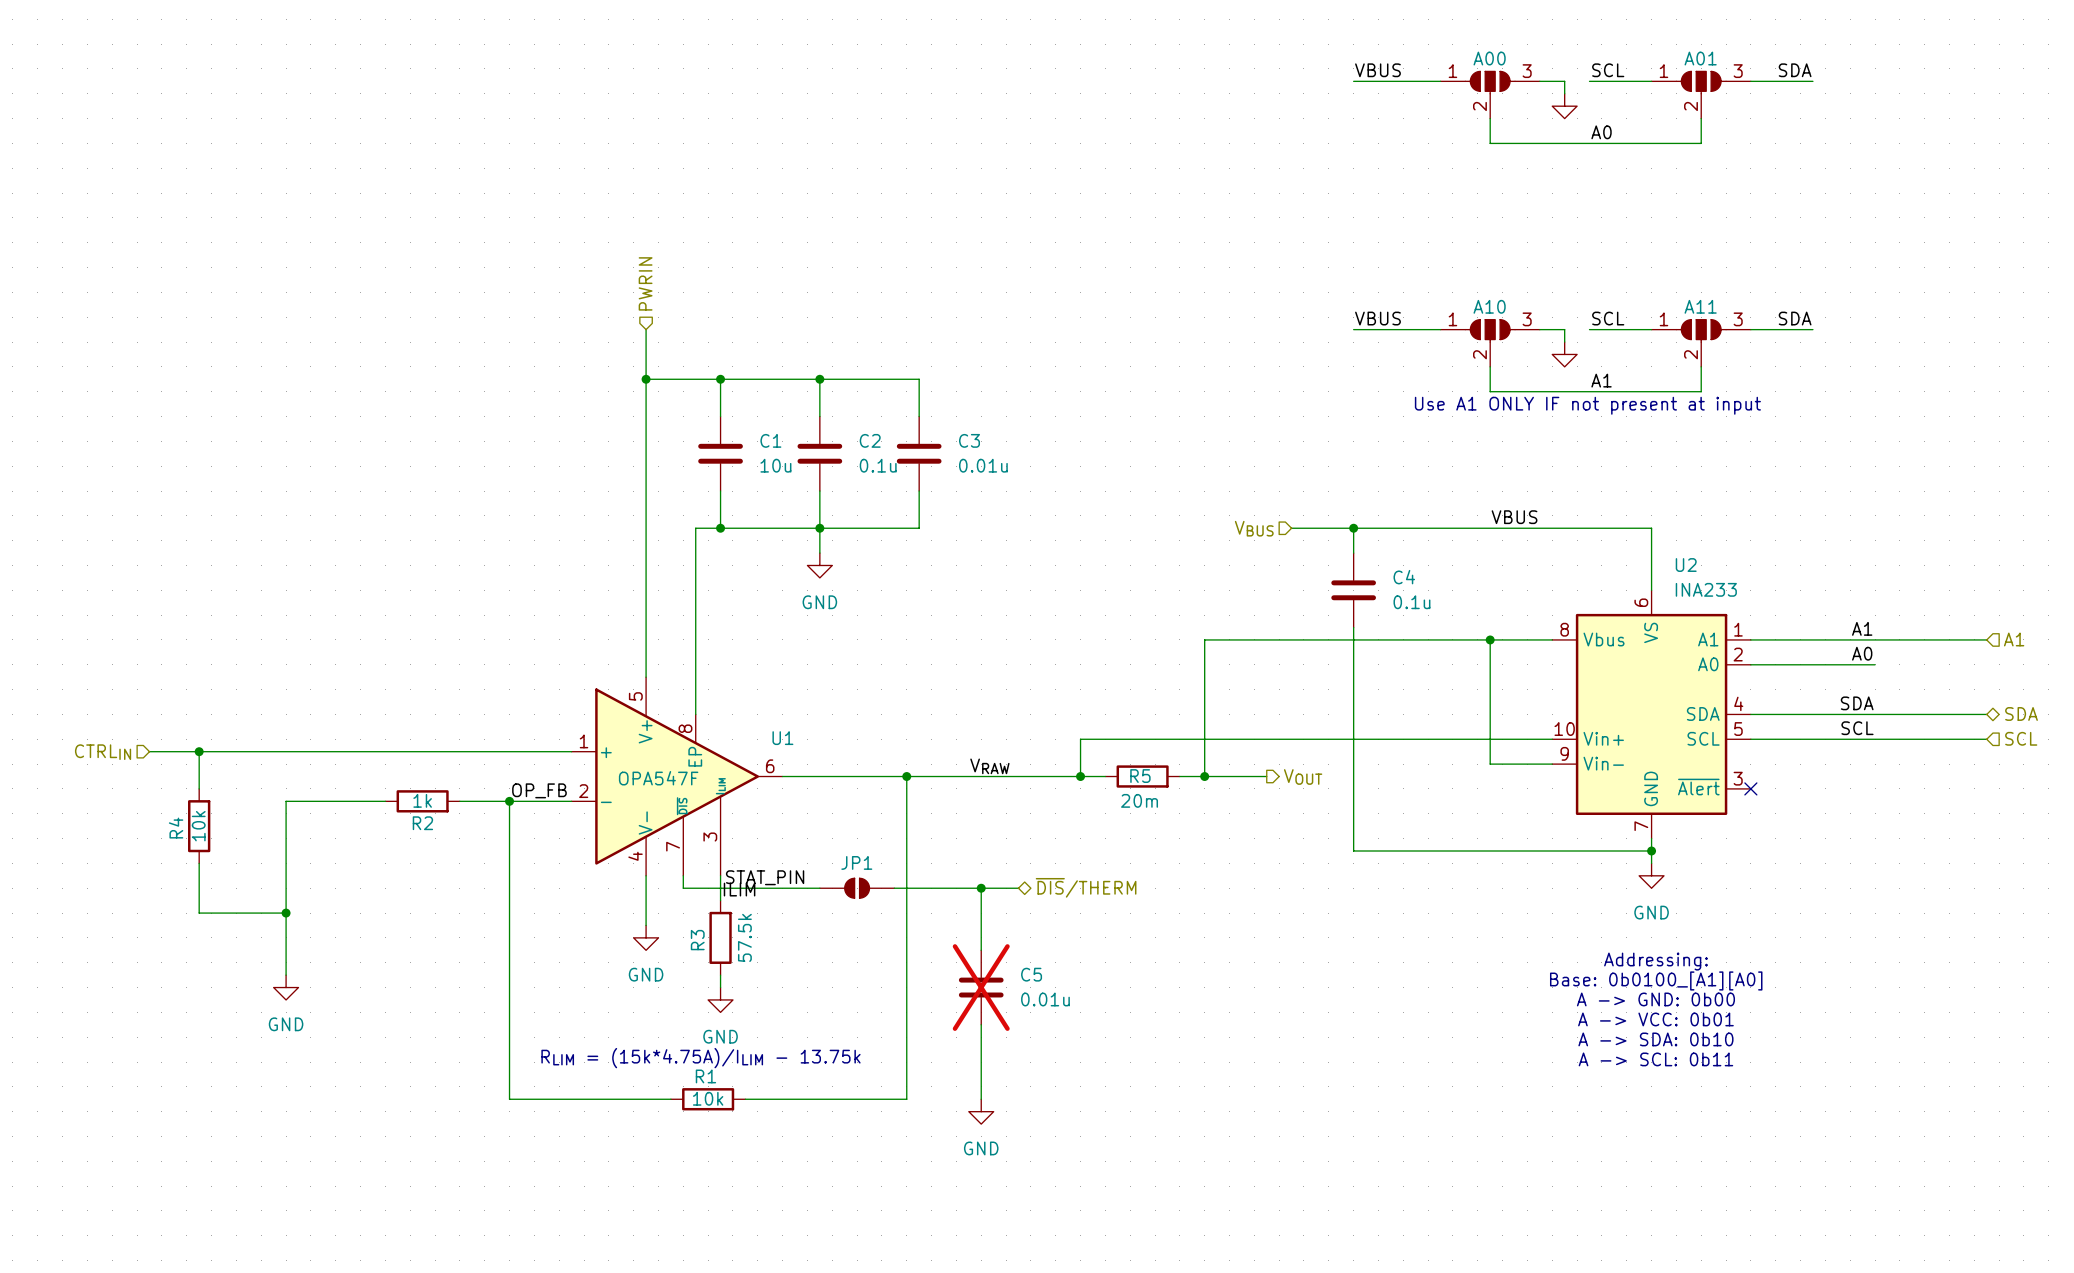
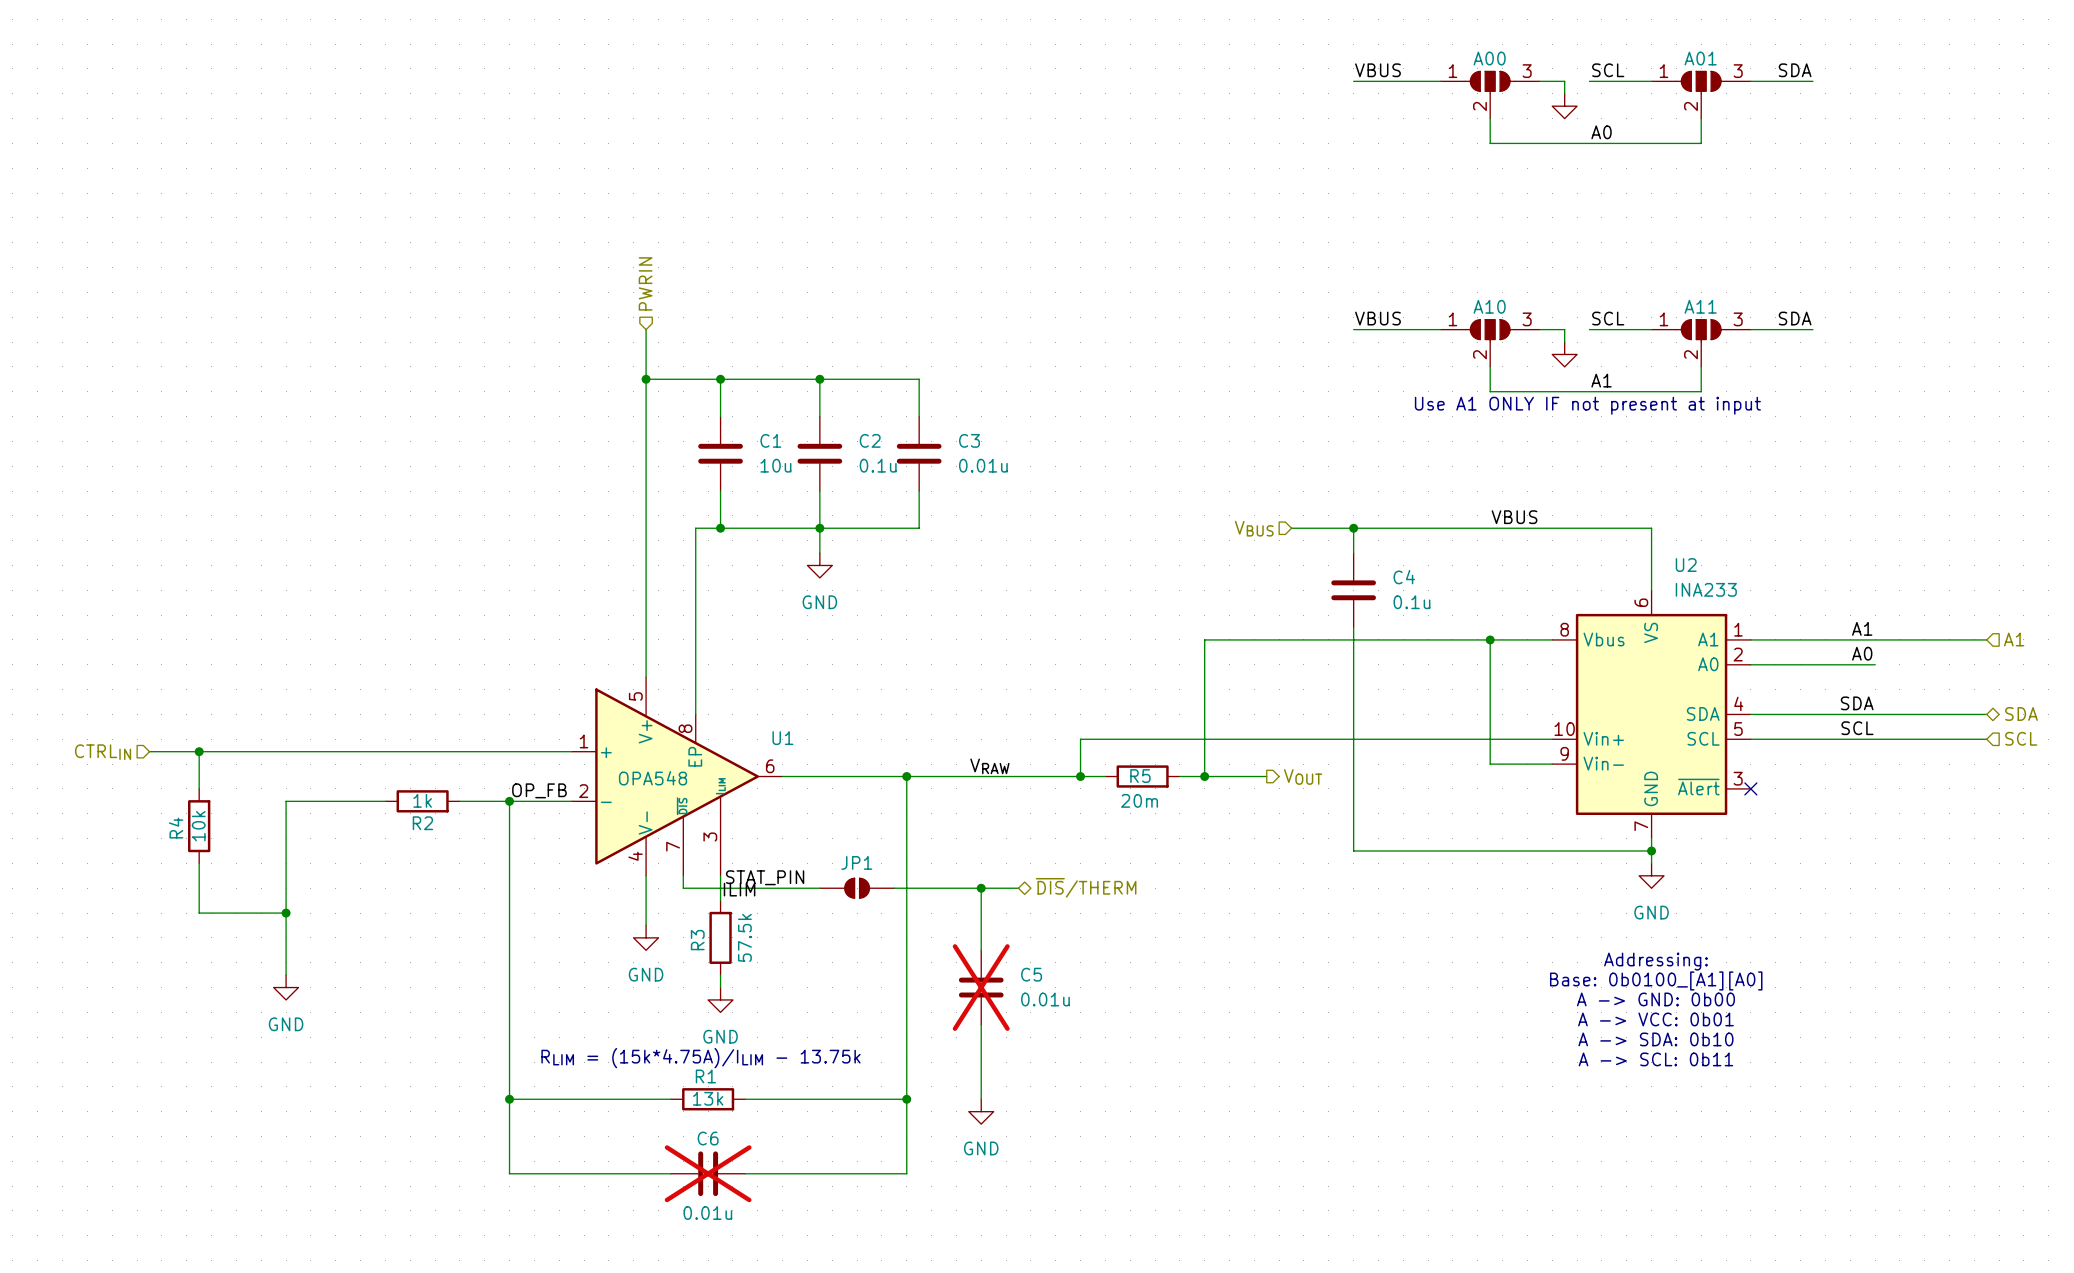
U1 value: OPA547F (658, 778) -> OPA548 (653, 778)
R1 value: 10k (708, 1098) -> 13k (708, 1098)
wire: none -> (509, 1099) (509, 1173) (670, 1173)
junction: none -> (509, 1099)
wire: none -> (906, 1099) (906, 1173) (745, 1173)
junction: none -> (906, 1099)
C6: none -> 0.01u (708, 1173)

